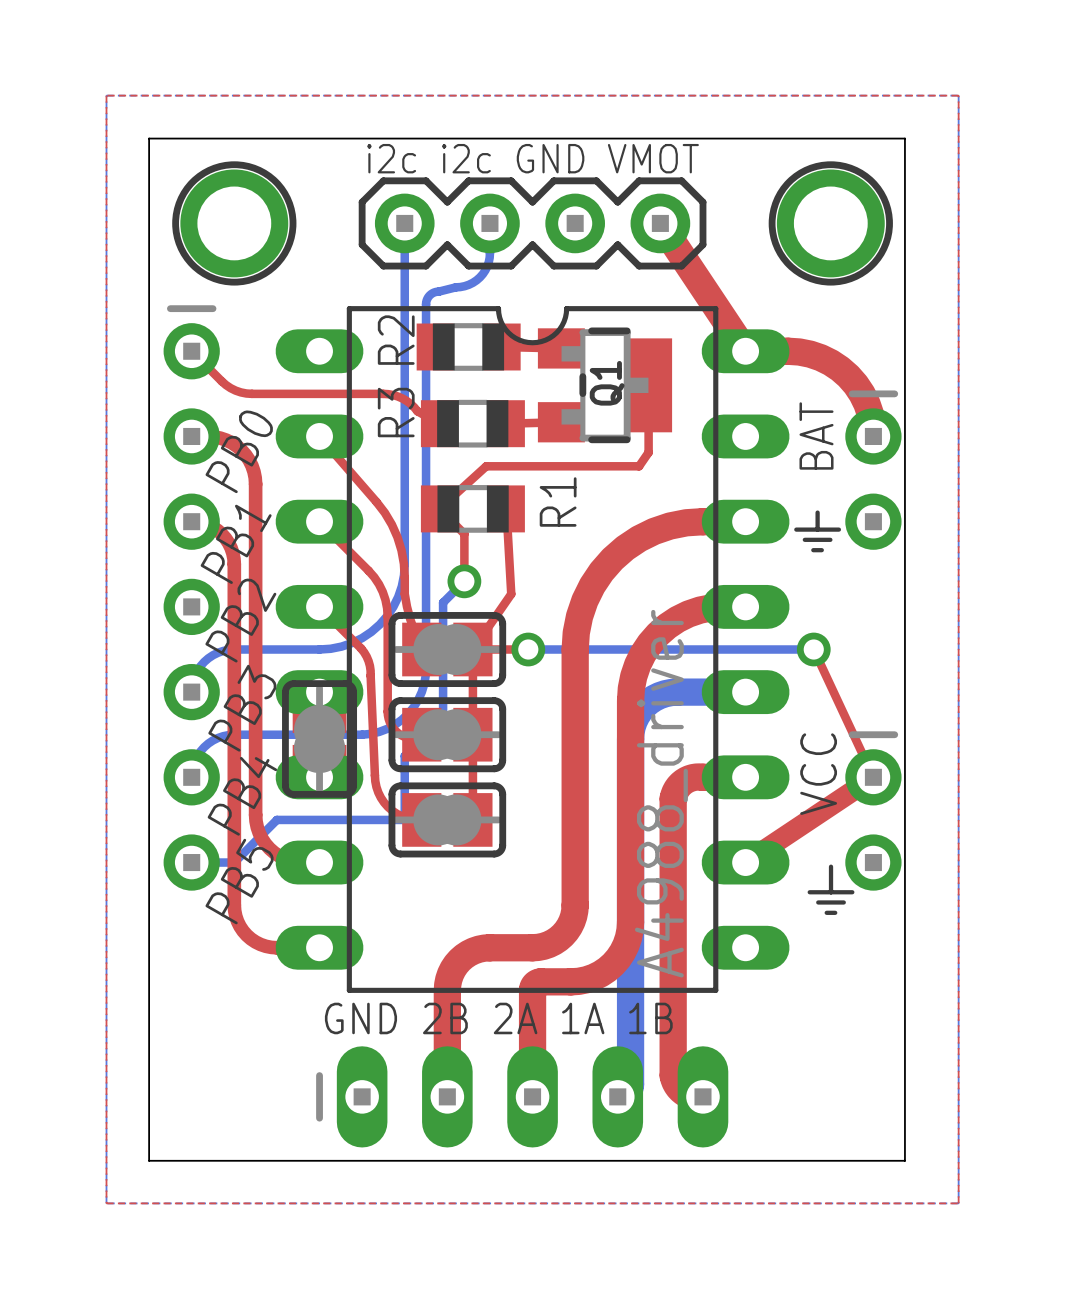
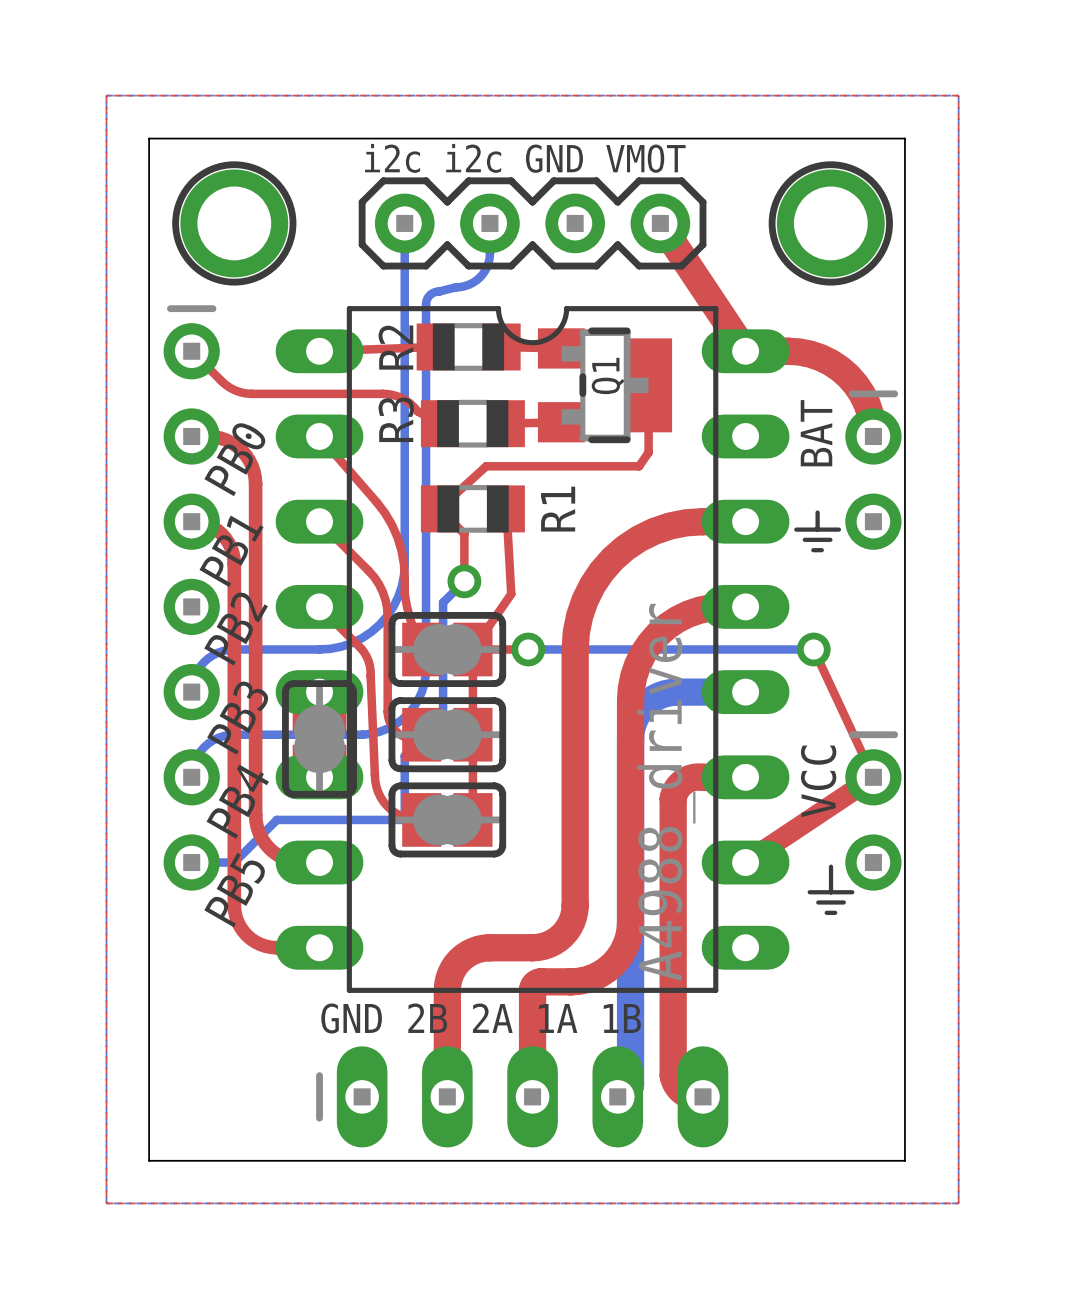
top track: none -> (435, 347) (319, 351)

